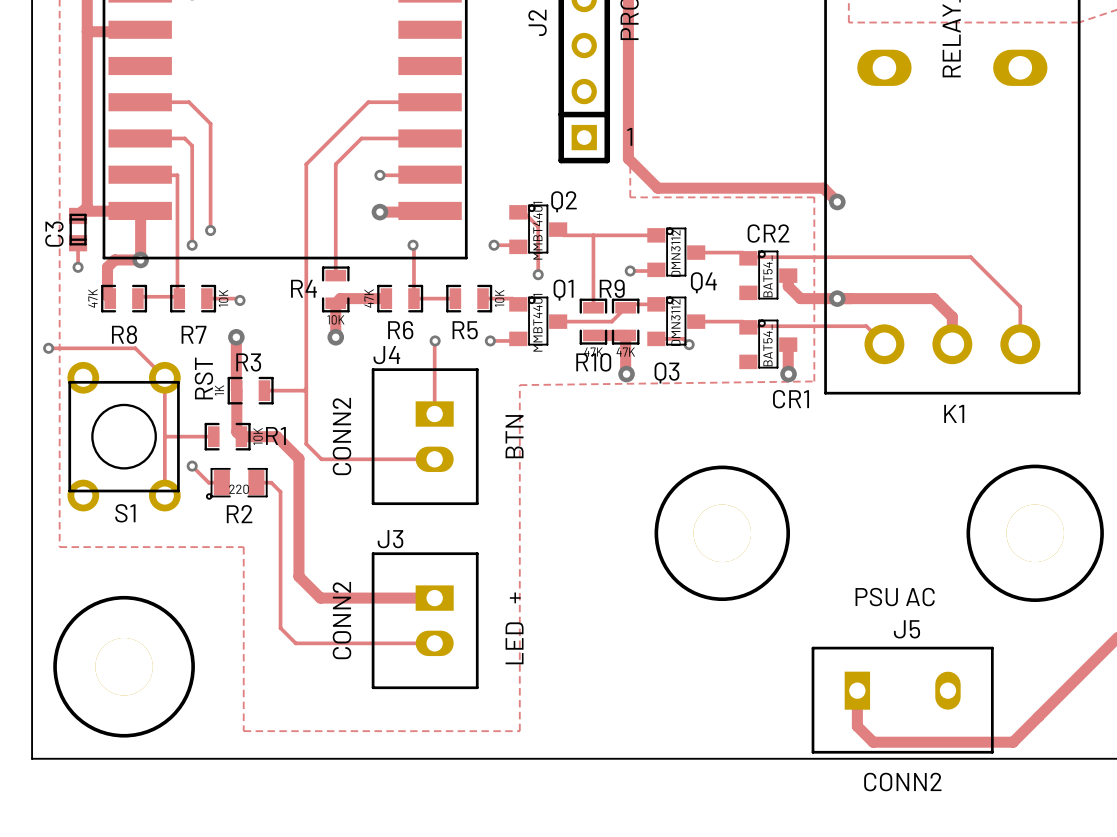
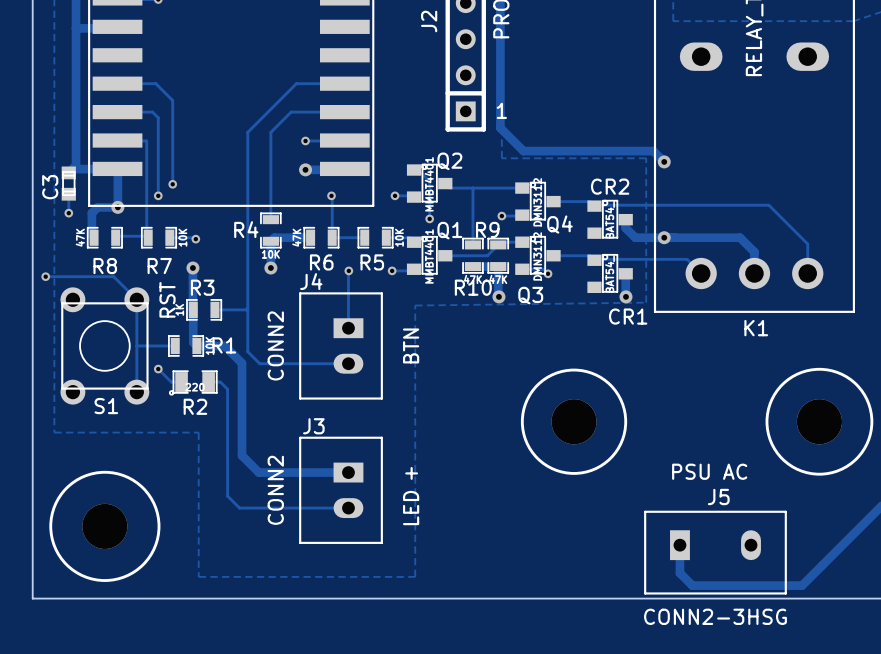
J5 value: CONN2 (902, 782) -> CONN2-3HSG (715, 616)

